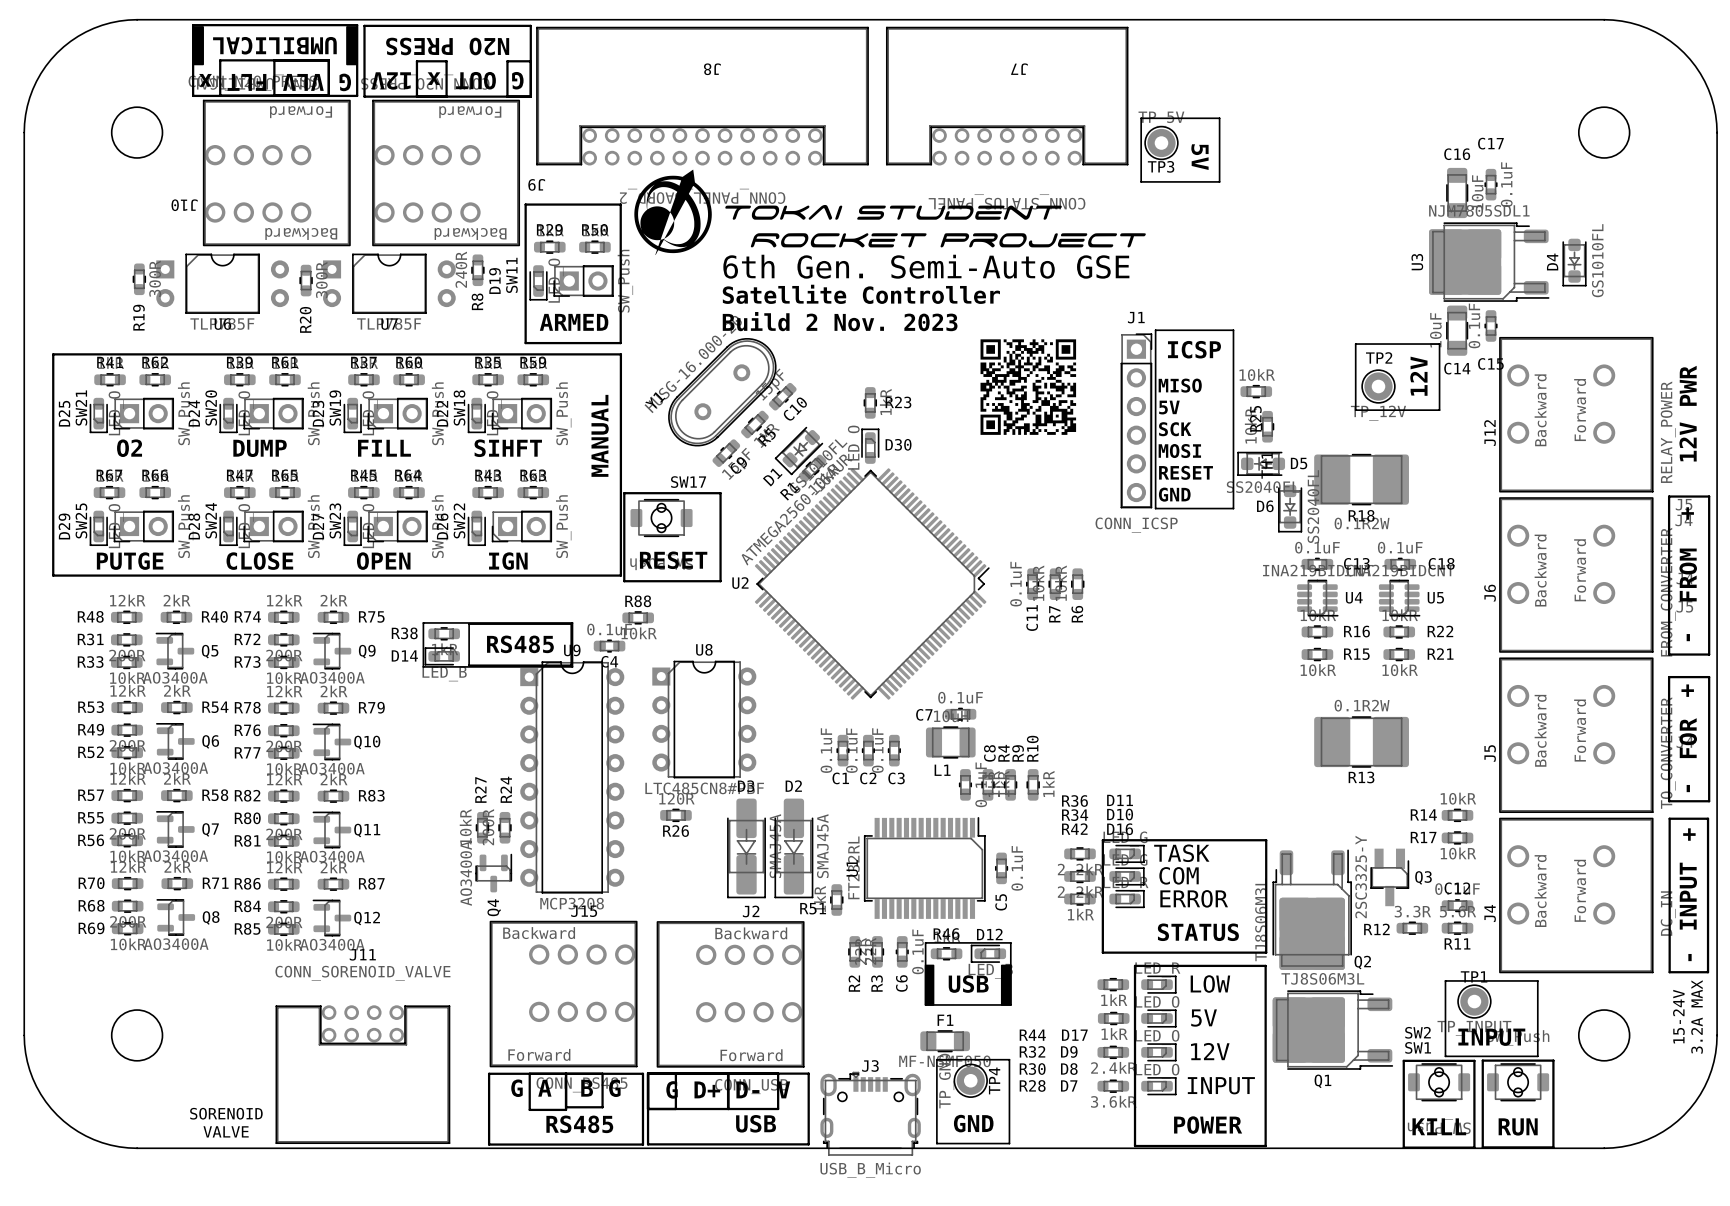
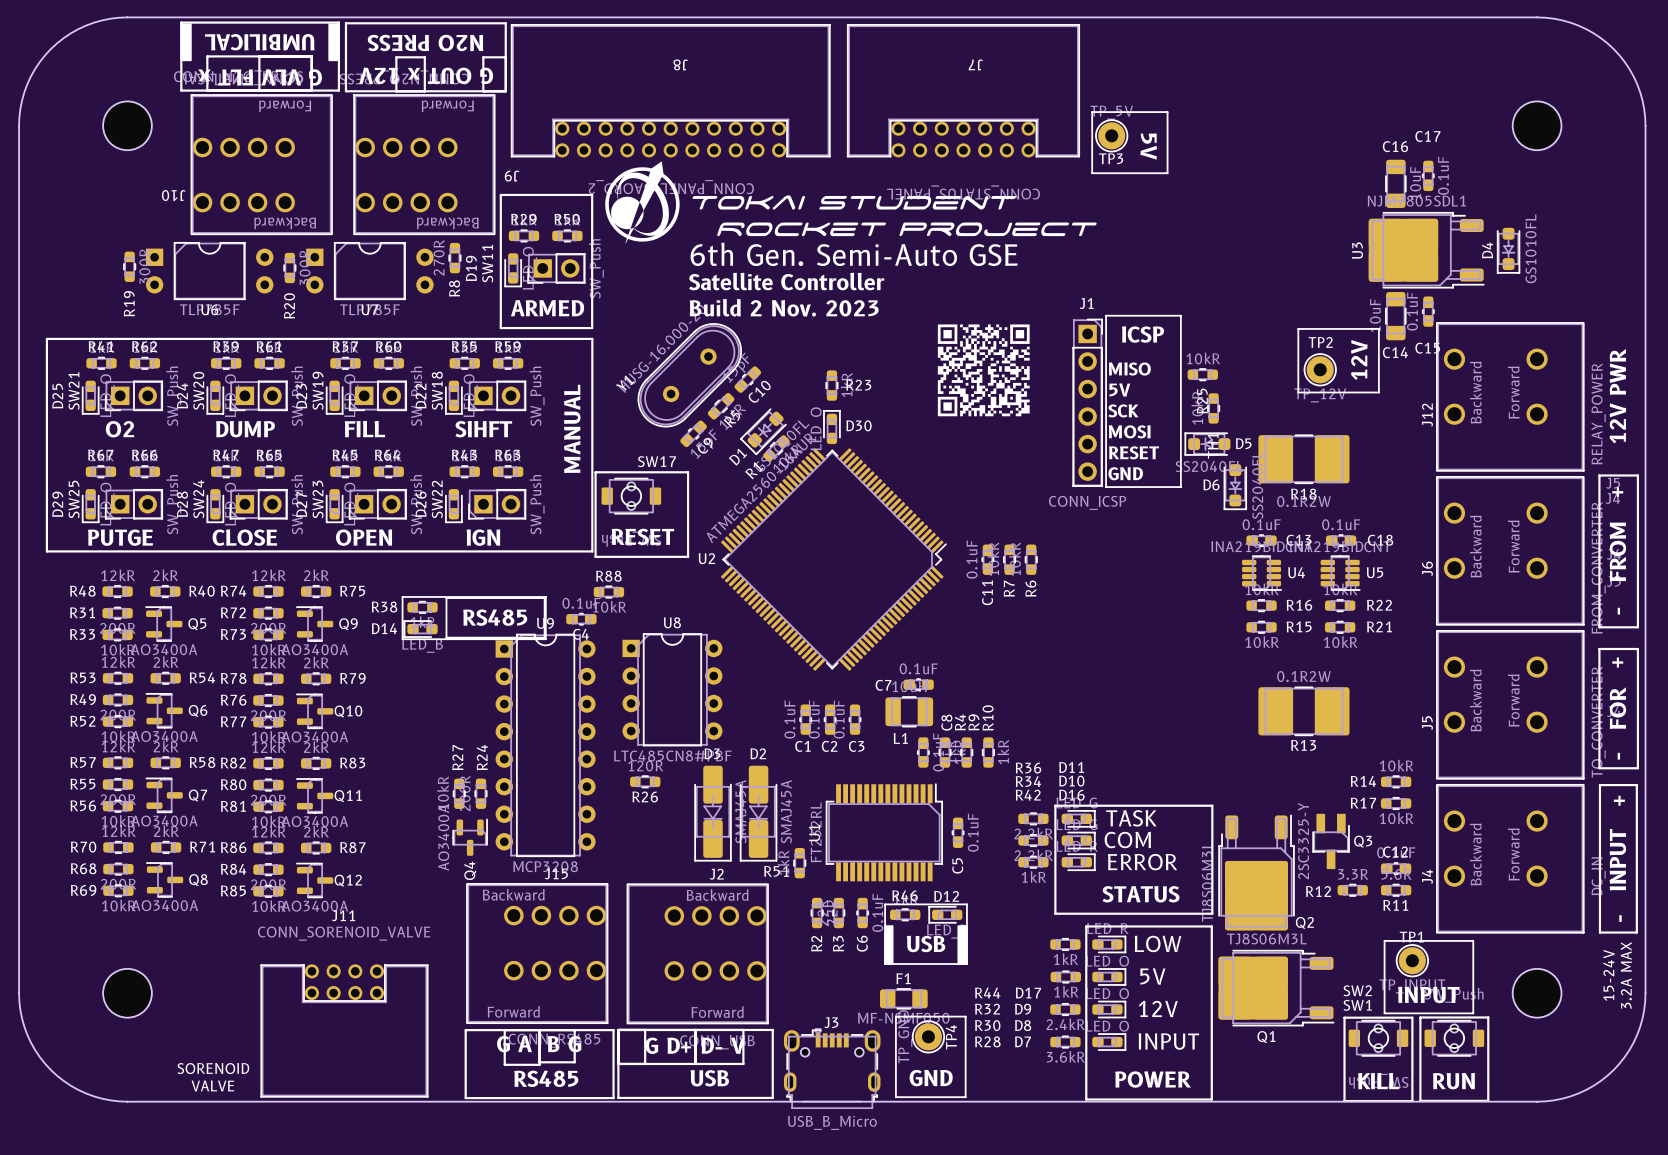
R8 value: 240R (461, 269) -> 270R (439, 257)

